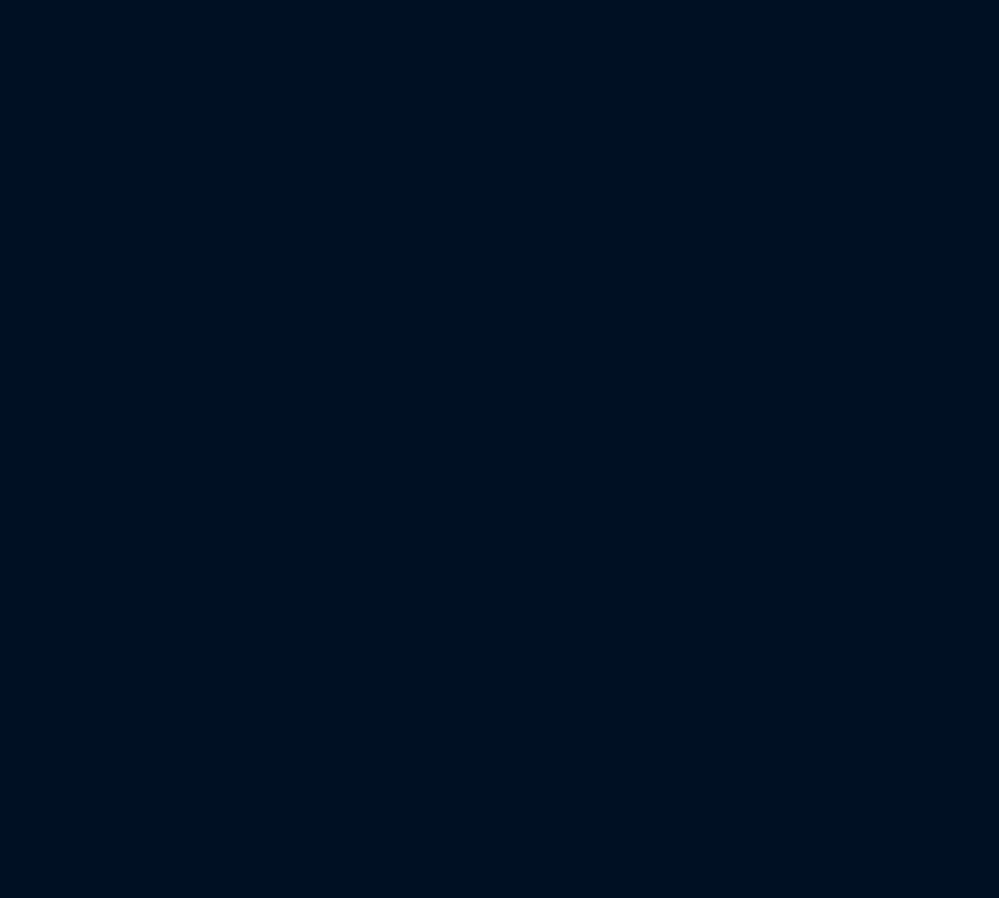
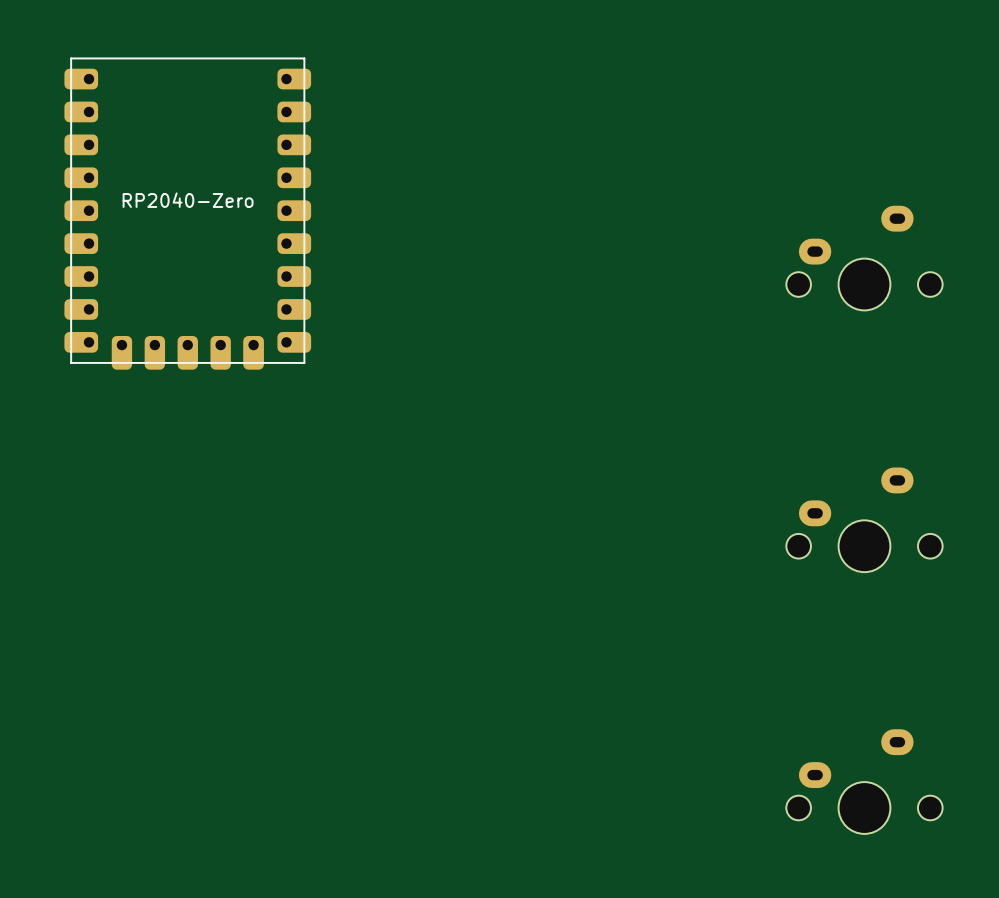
part: none -> RP2040-Zero (187, 213)
part: none -> (864, 258)
part: none -> (864, 519)
part: none -> (864, 781)

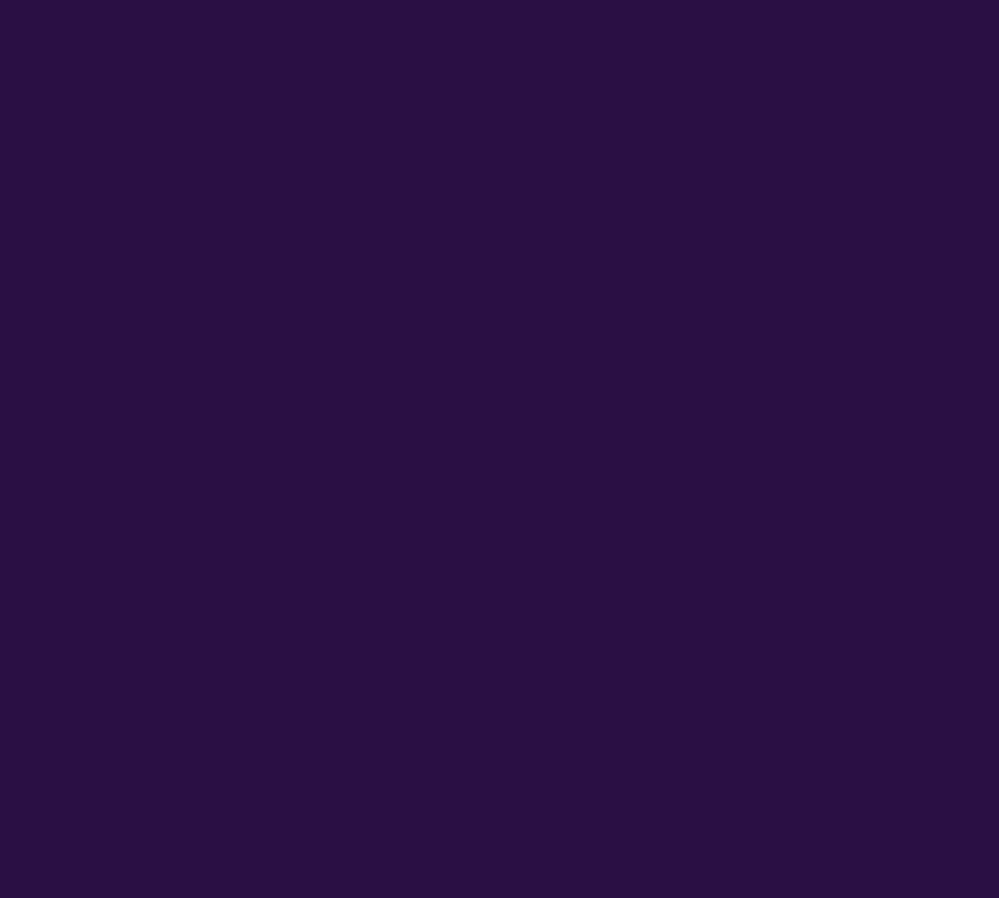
part: RP2040-Zero (187, 213) -> none
part: (864, 258) -> none
part: (864, 519) -> none
part: (864, 781) -> none

